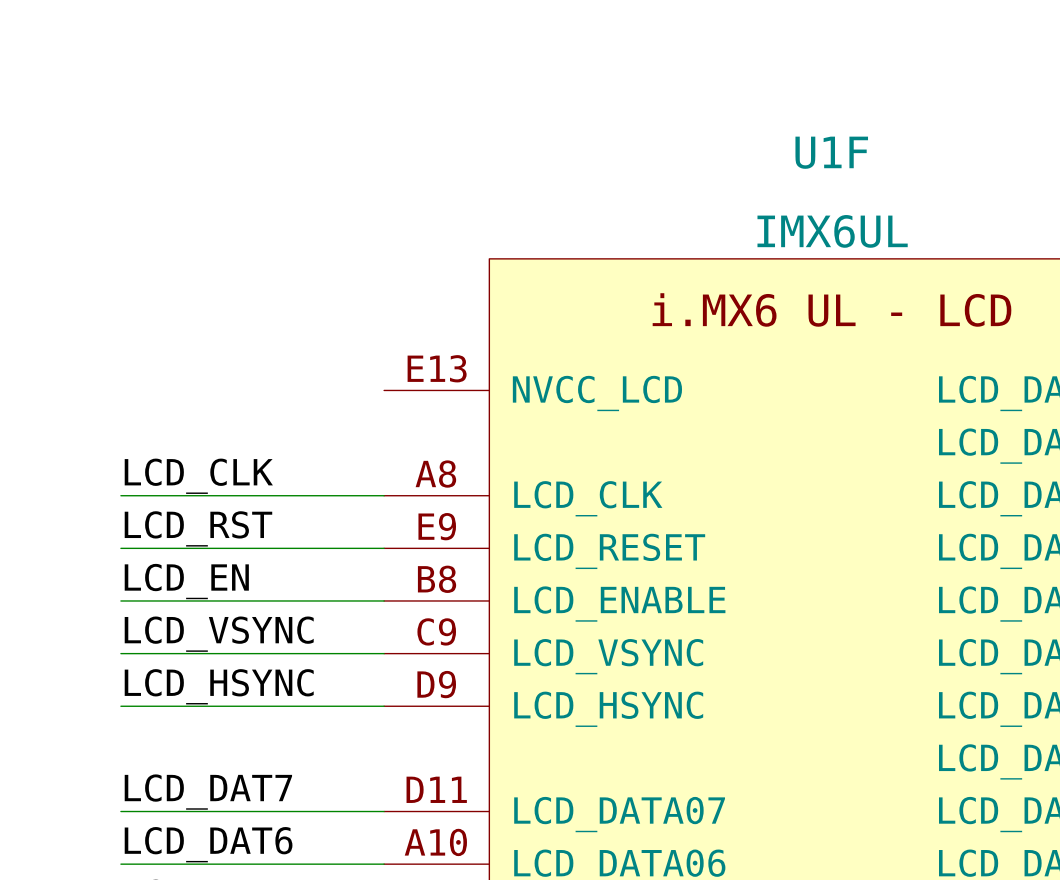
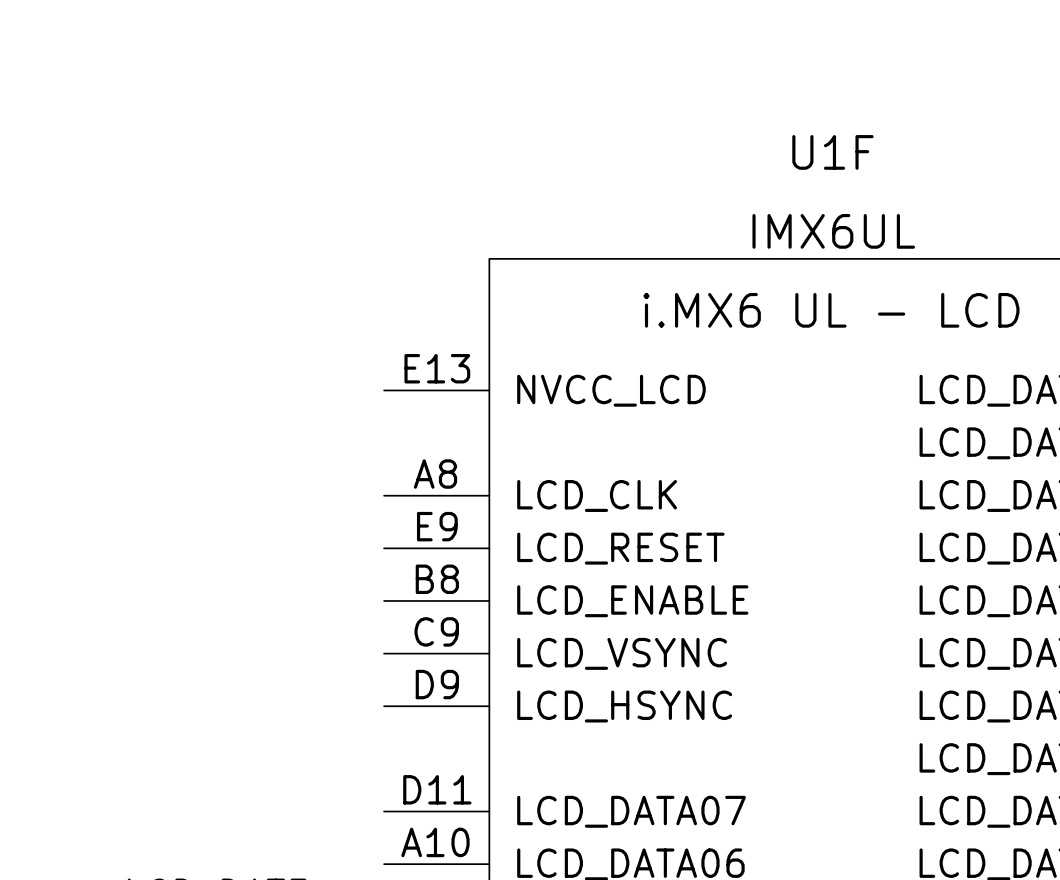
label: LCD_CLK (198, 476) -> none
wire: (120, 495) (384, 495) -> none
label: LCD_RST (198, 528) -> none
wire: (120, 548) (384, 548) -> none
label: LCD_EN (186, 581) -> none
wire: (120, 600) (384, 600) -> none
label: LCD_VSYNC (219, 634) -> none
wire: (120, 653) (384, 653) -> none
label: LCD_HSYNC (219, 686) -> none
wire: (120, 706) (384, 706) -> none
label: LCD_DAT7 (208, 792) -> none
wire: (120, 811) (384, 811) -> none
label: LCD_DAT6 (208, 844) -> none
wire: (120, 864) (384, 864) -> none

